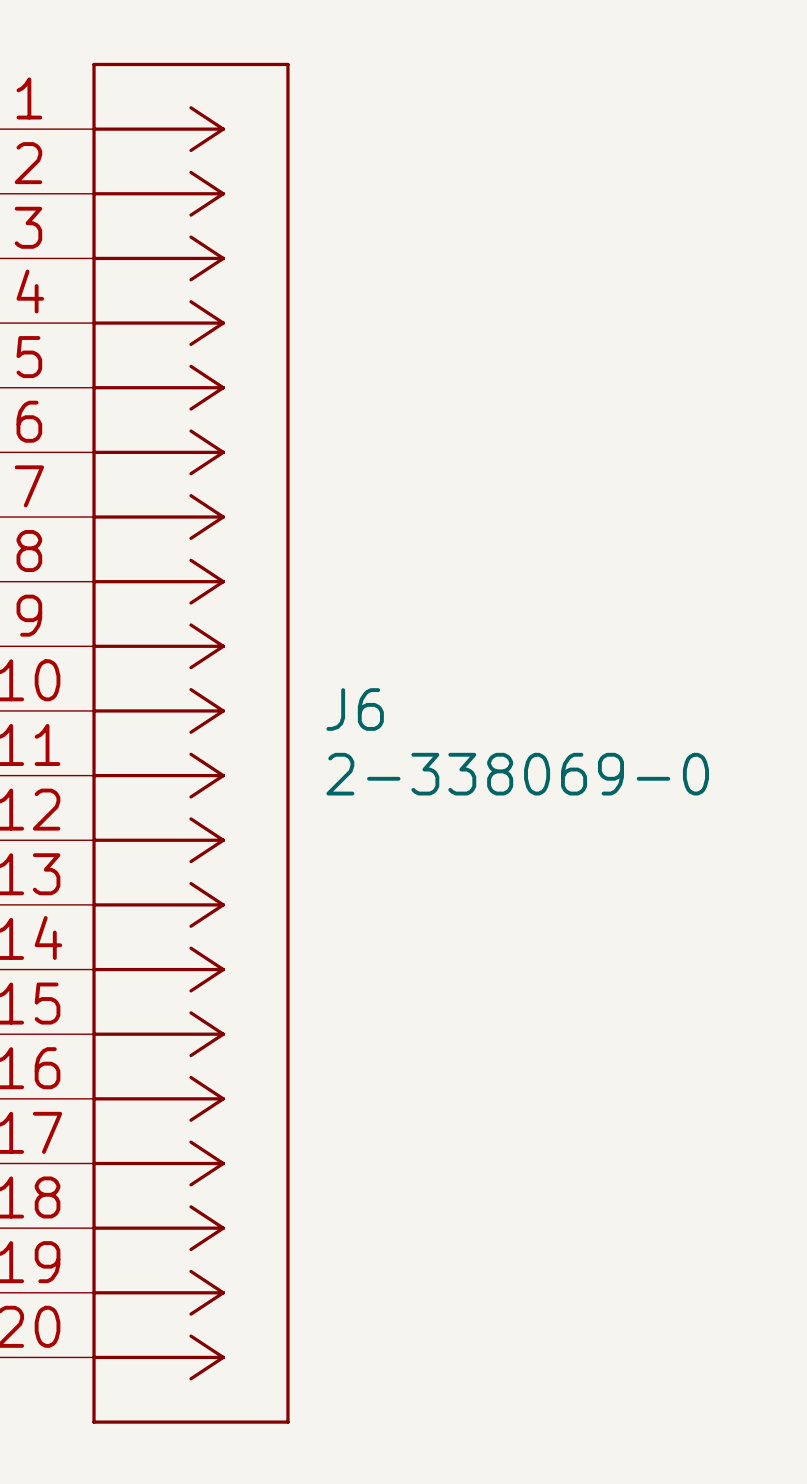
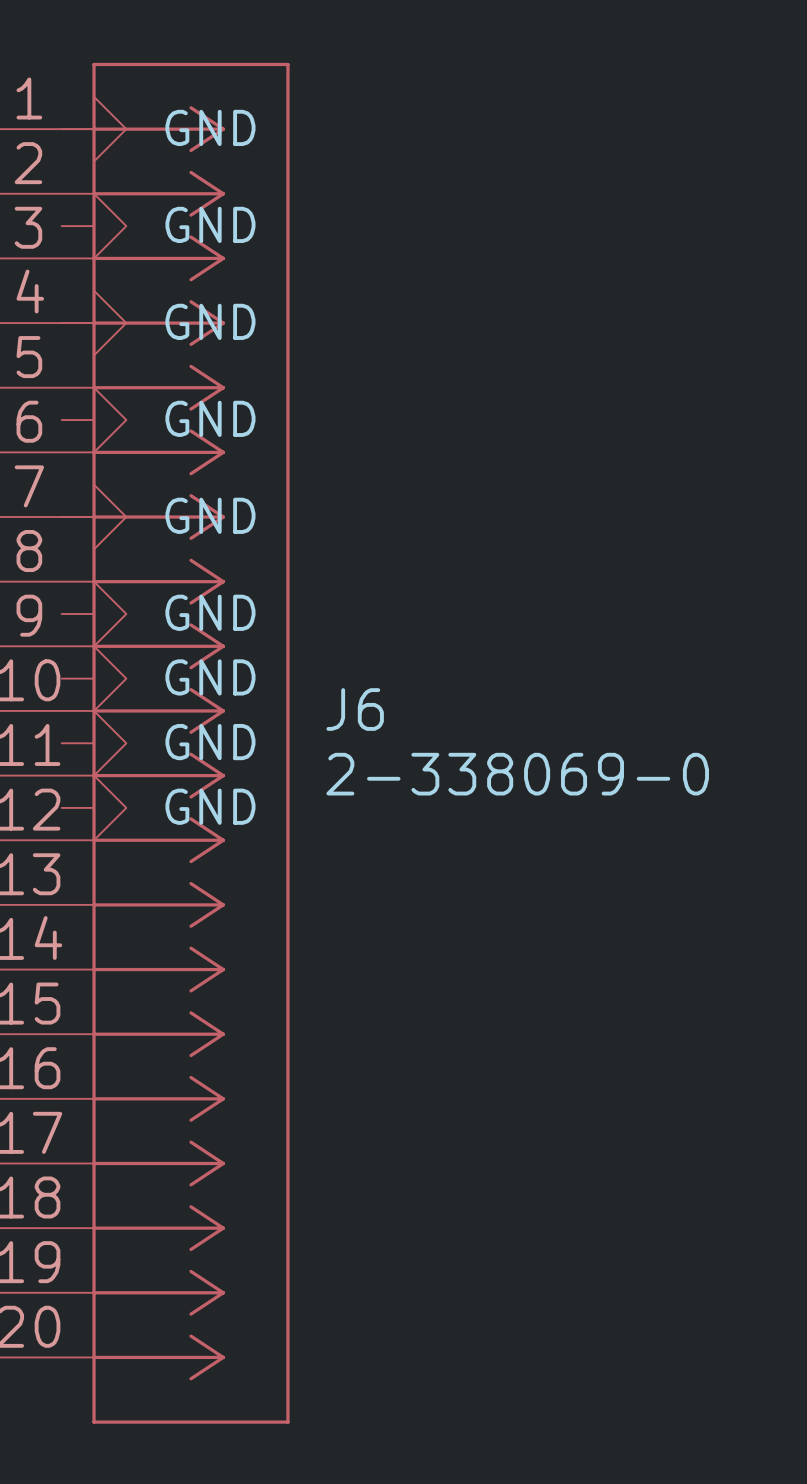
power symbol: none -> GND (94, 129)
power symbol: none -> GND (94, 226)
power symbol: none -> GND (94, 323)
power symbol: none -> GND (94, 420)
power symbol: none -> GND (94, 517)
power symbol: none -> GND (94, 613)
power symbol: none -> GND (94, 678)
power symbol: none -> GND (94, 743)
power symbol: none -> GND (94, 807)

